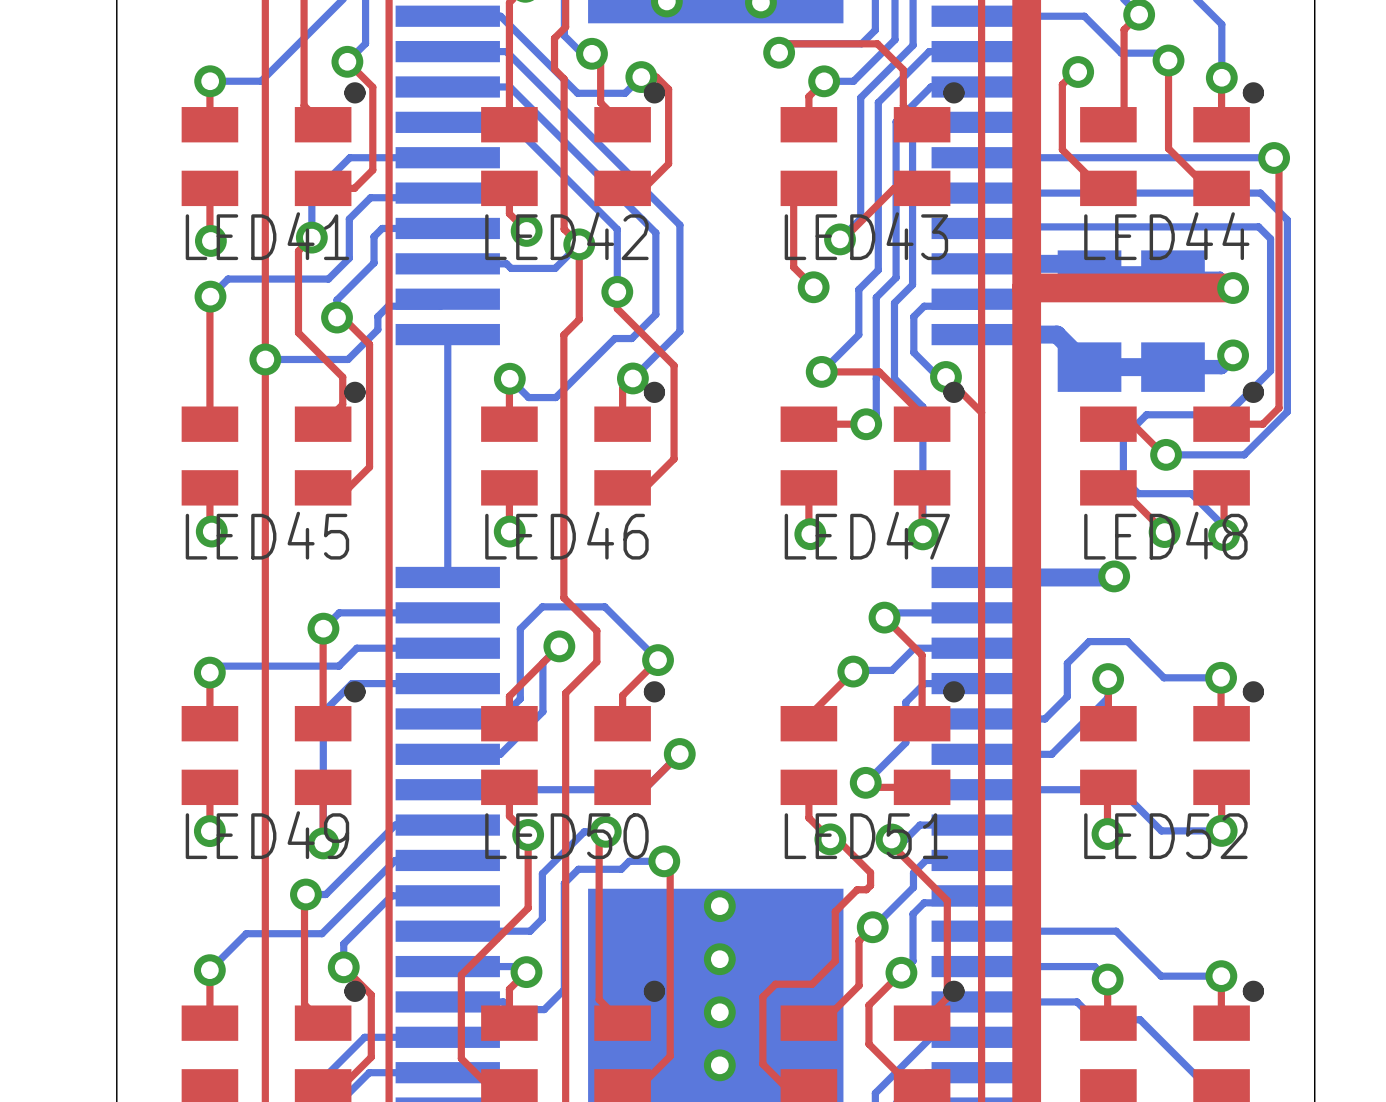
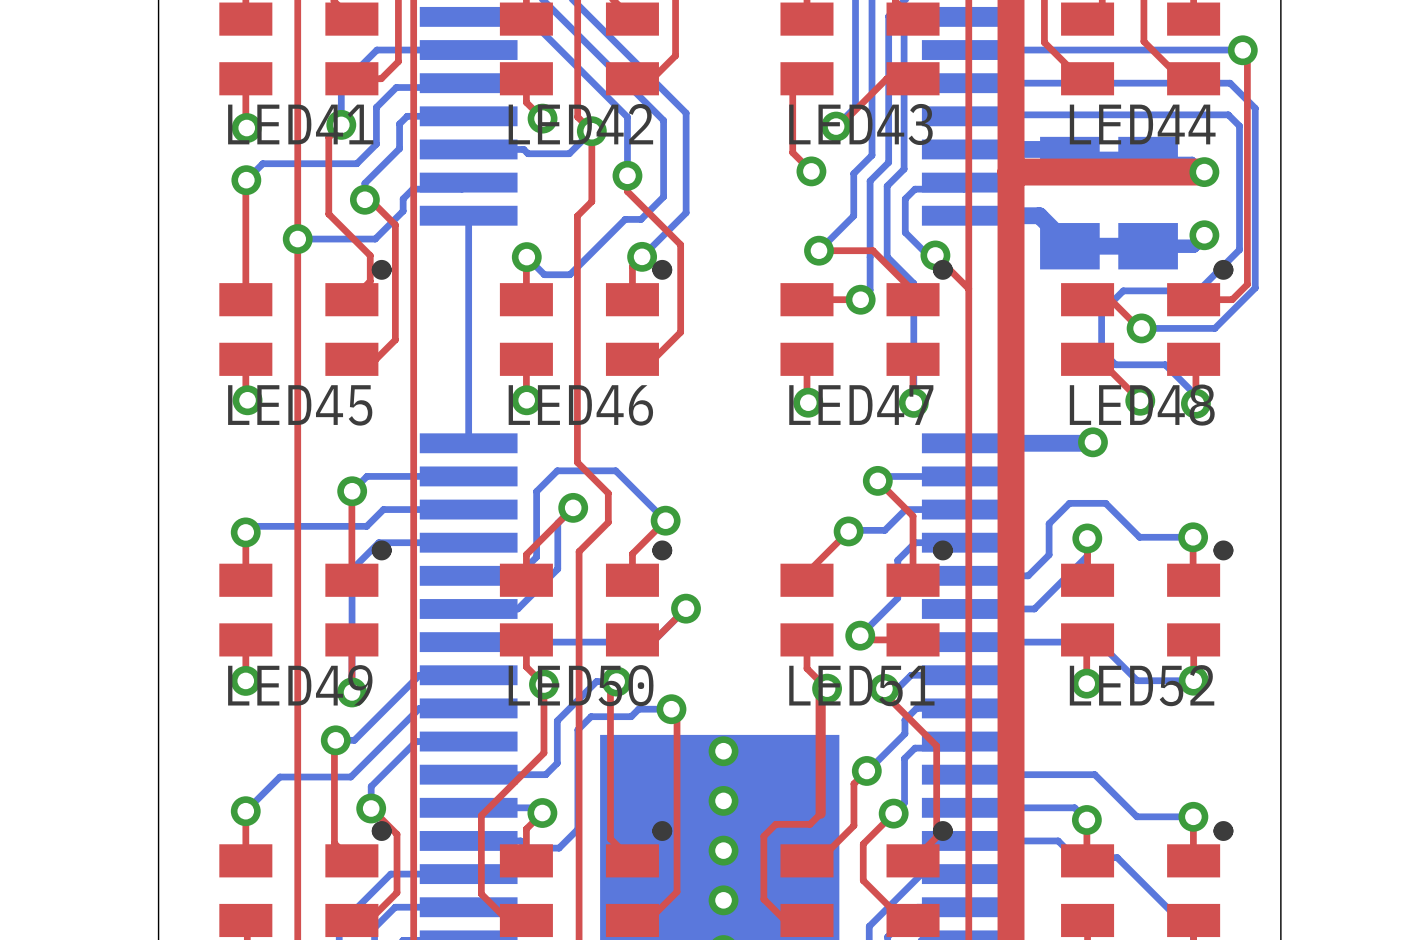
top track: (830, 839) (837, 839) (870, 872) (870, 885) (866, 889) (857, 889) (835, 911) (835, 961) (823, 972) -> (827, 688) (820, 695) (820, 813)

